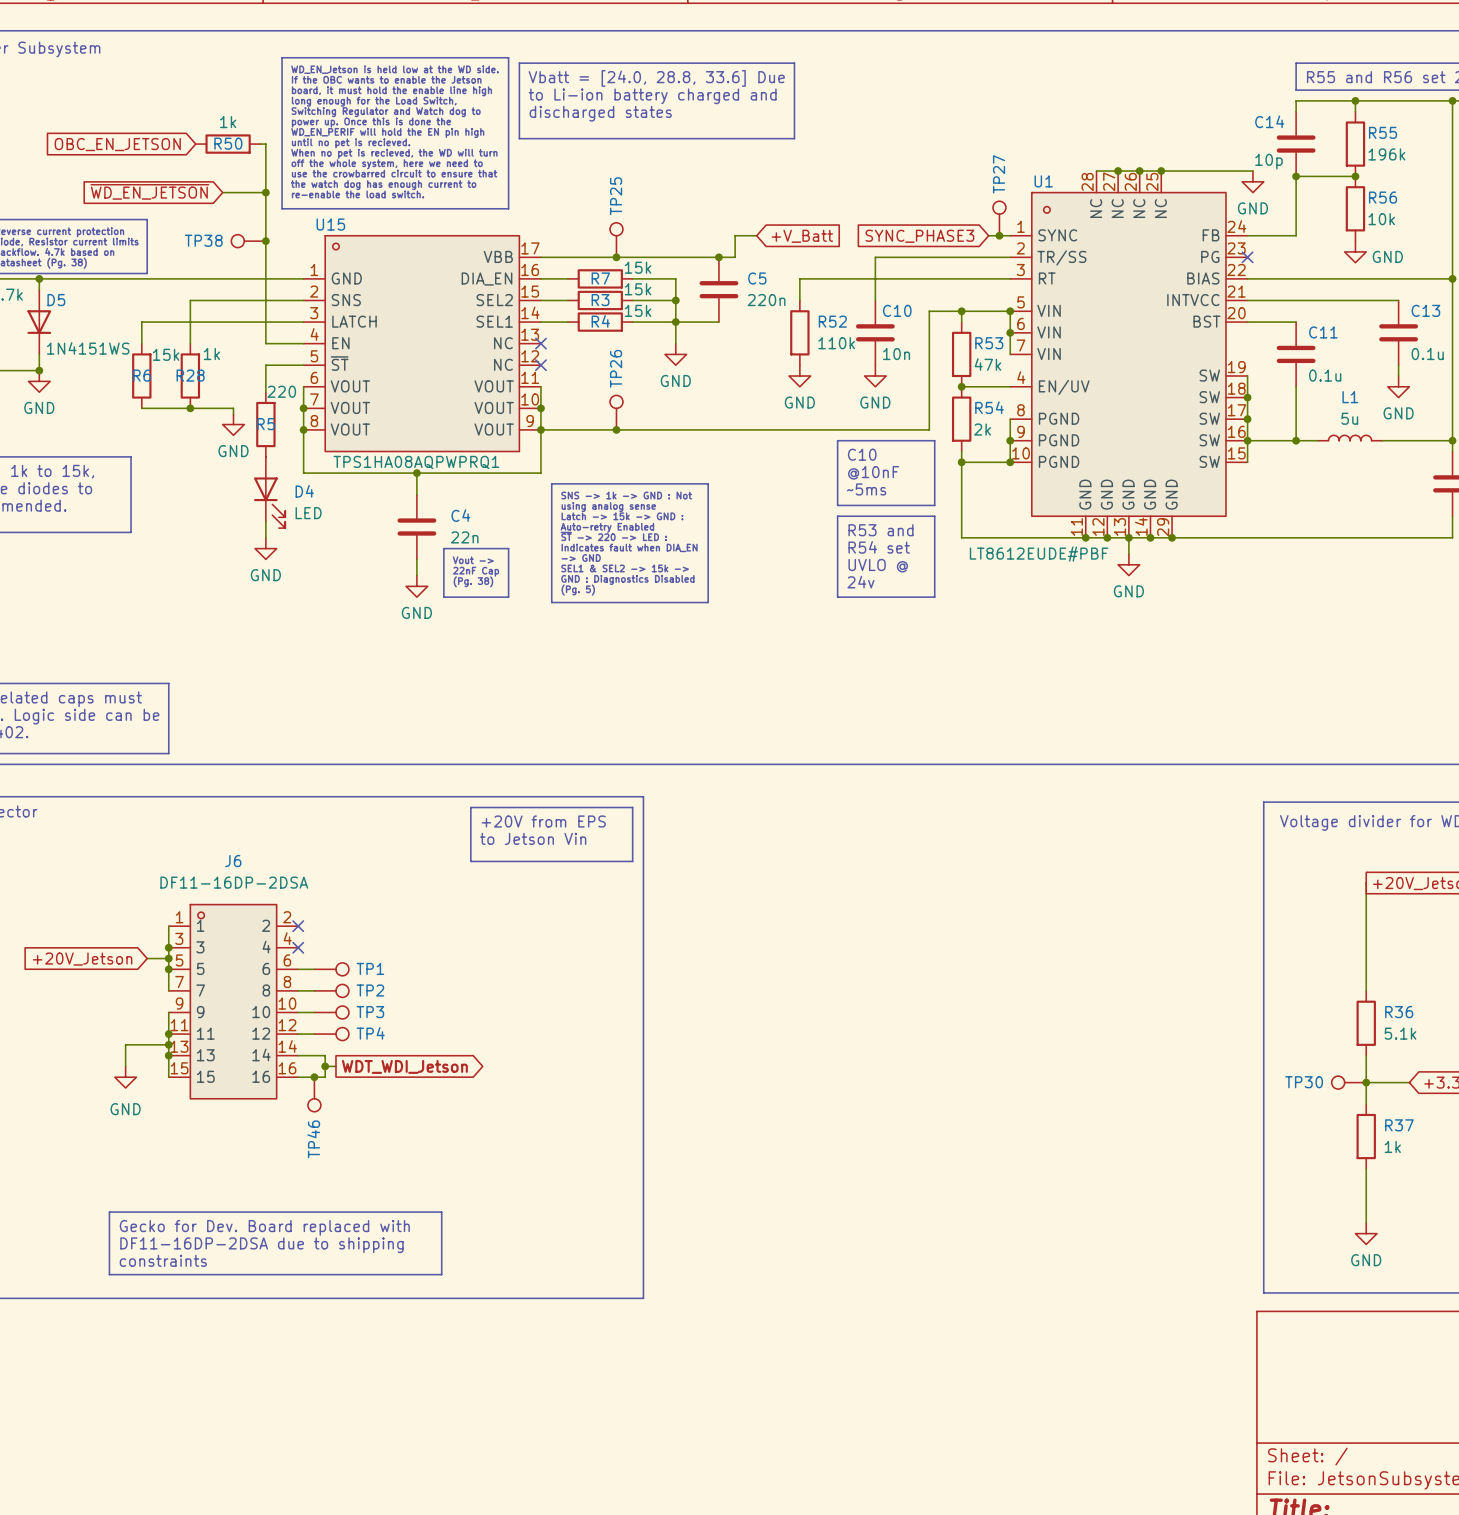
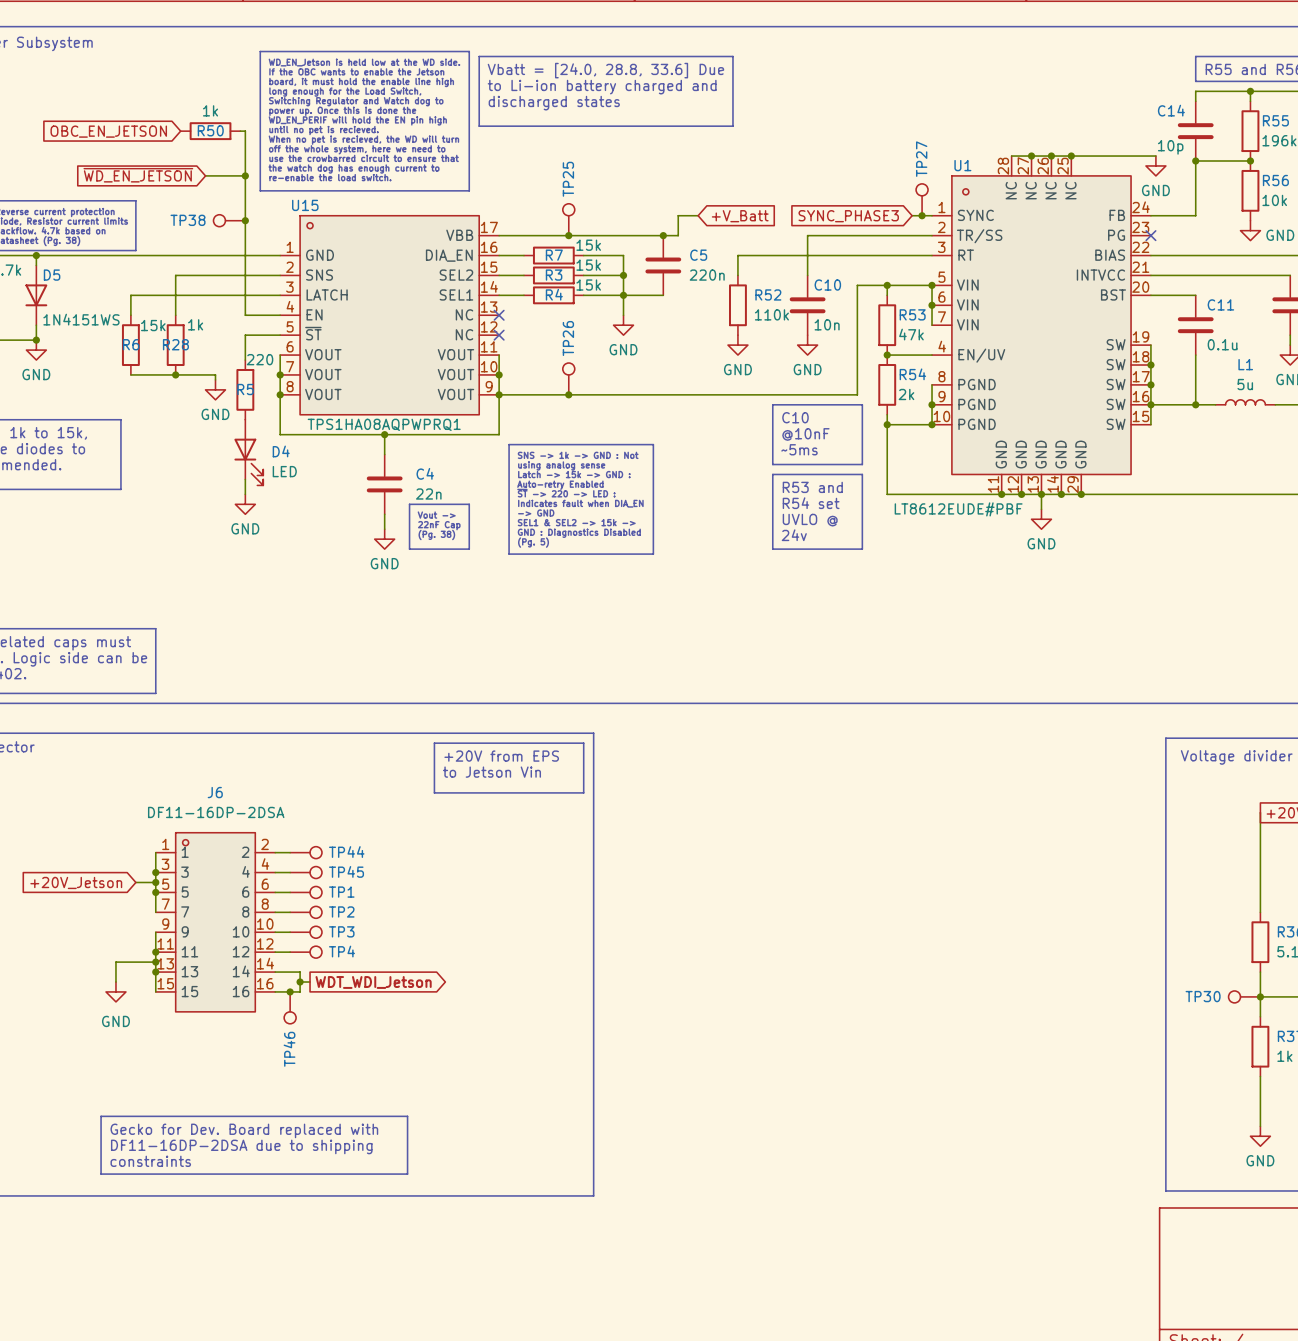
wire: none -> (275, 852) (290, 852)
no-connect mark: (298, 926) -> none
TP44: none -> (306, 852)
wire: none -> (275, 872) (290, 872)
no-connect mark: (298, 947) -> none
TP45: none -> (306, 872)

